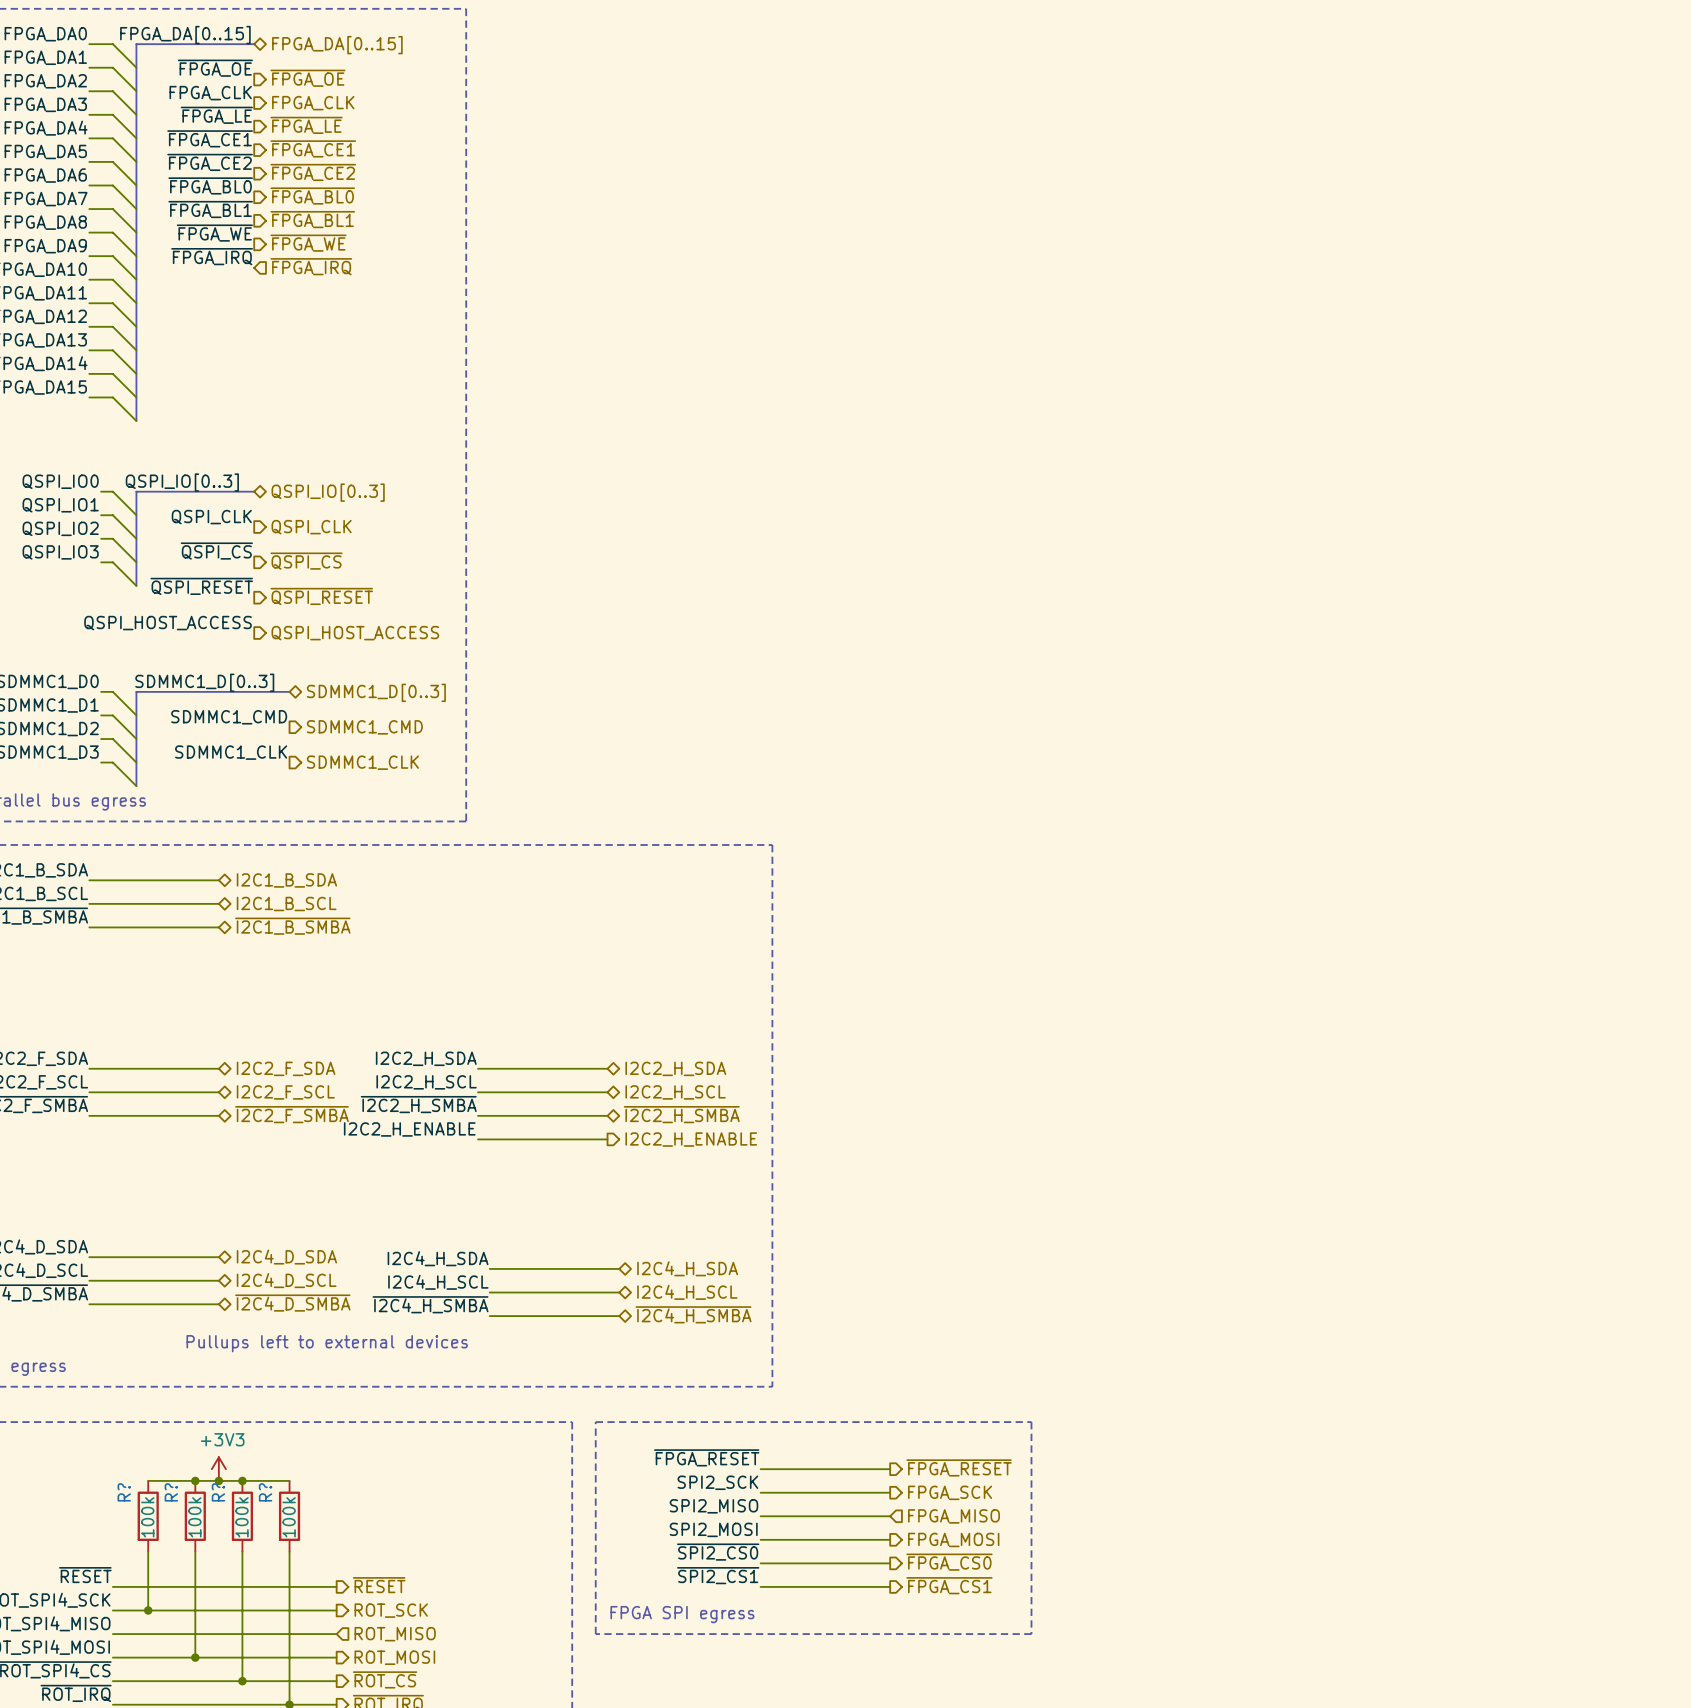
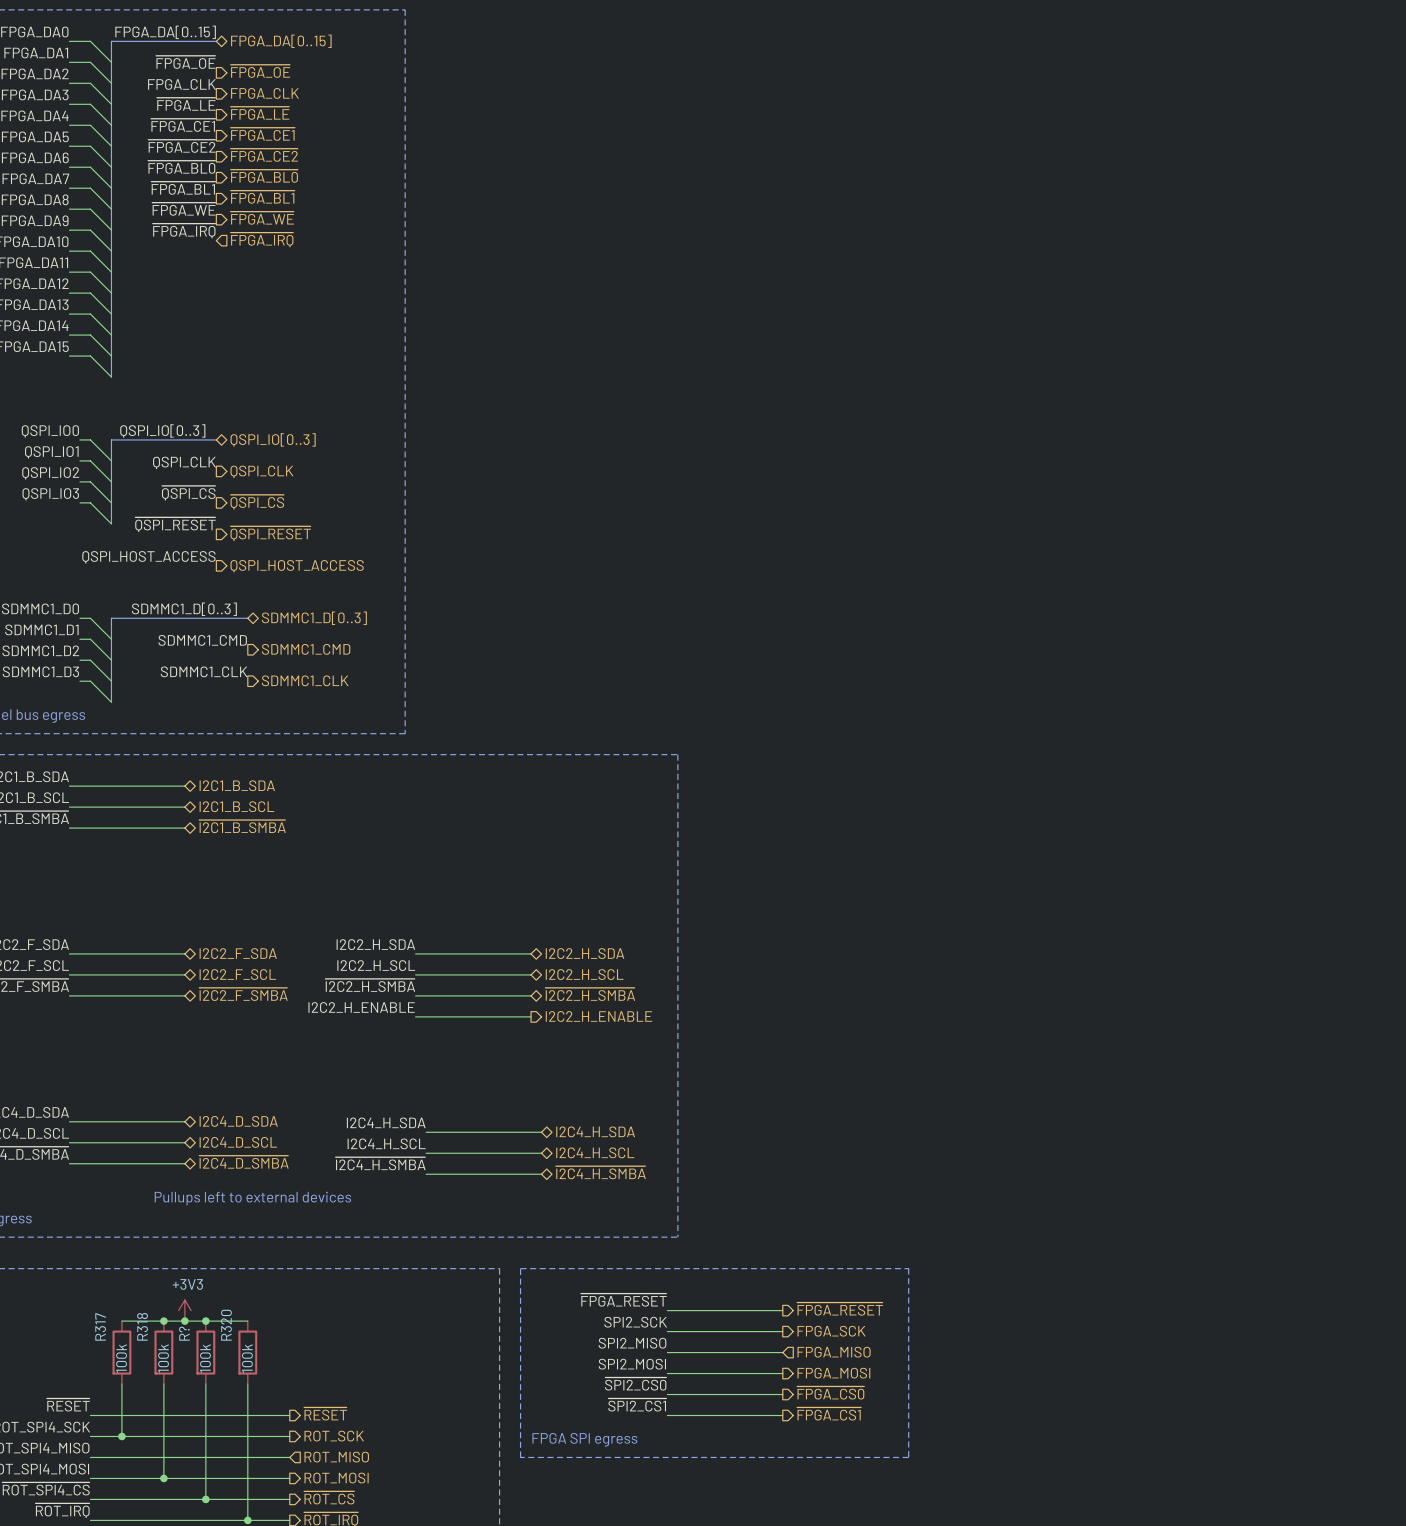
R? name: R? (124, 1492) -> R317 (100, 1326)
R? name: R? (171, 1492) -> R318 (142, 1326)
R? name: R? (265, 1492) -> R320 (226, 1325)

